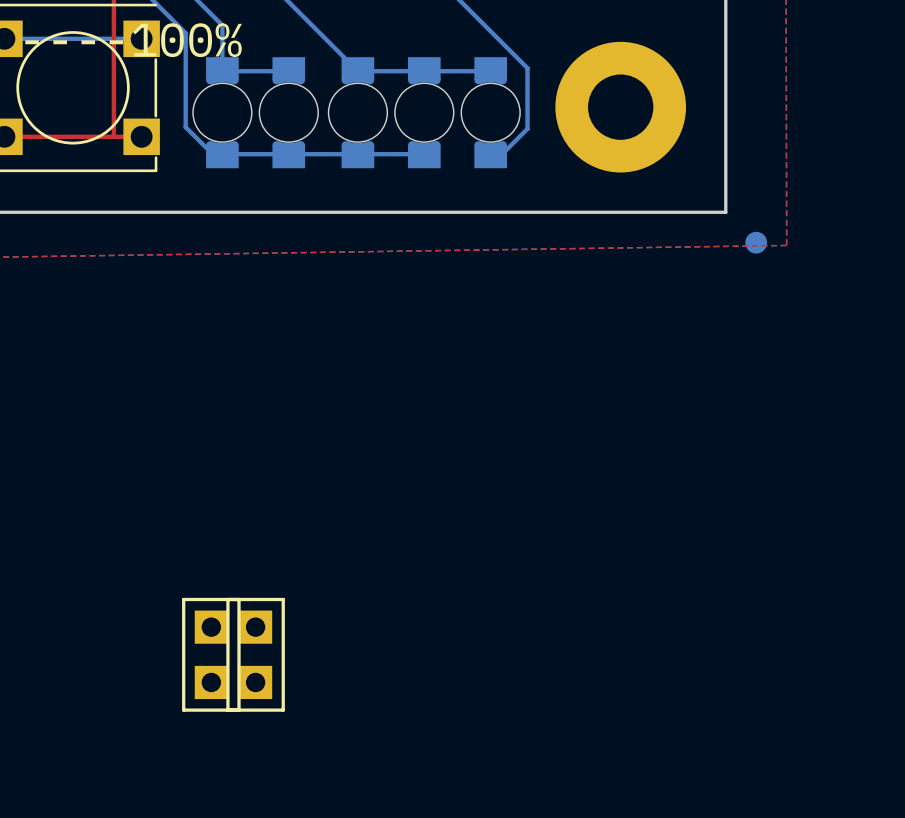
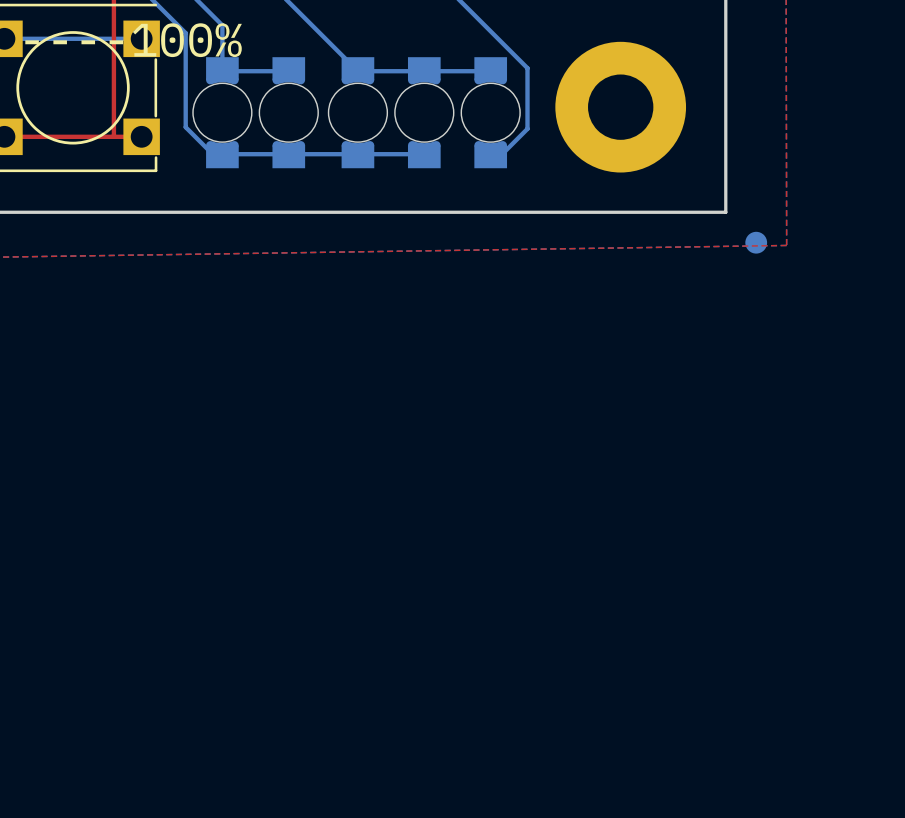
part: (211, 654) -> none
part: (255, 654) -> none

